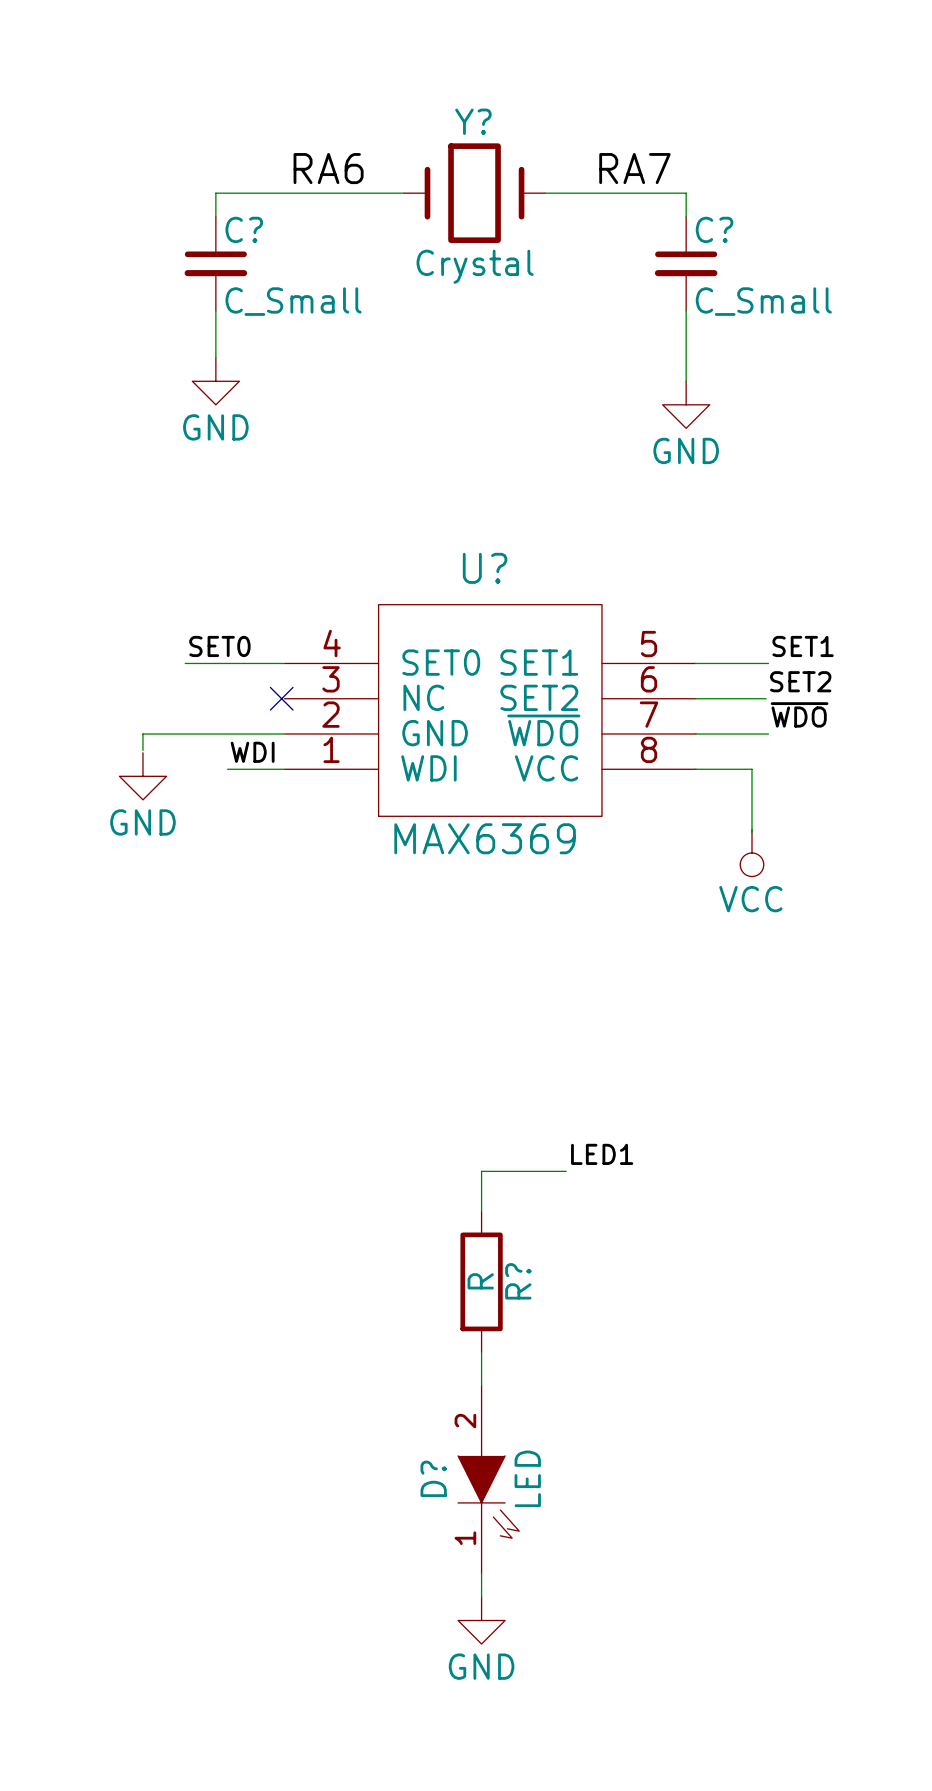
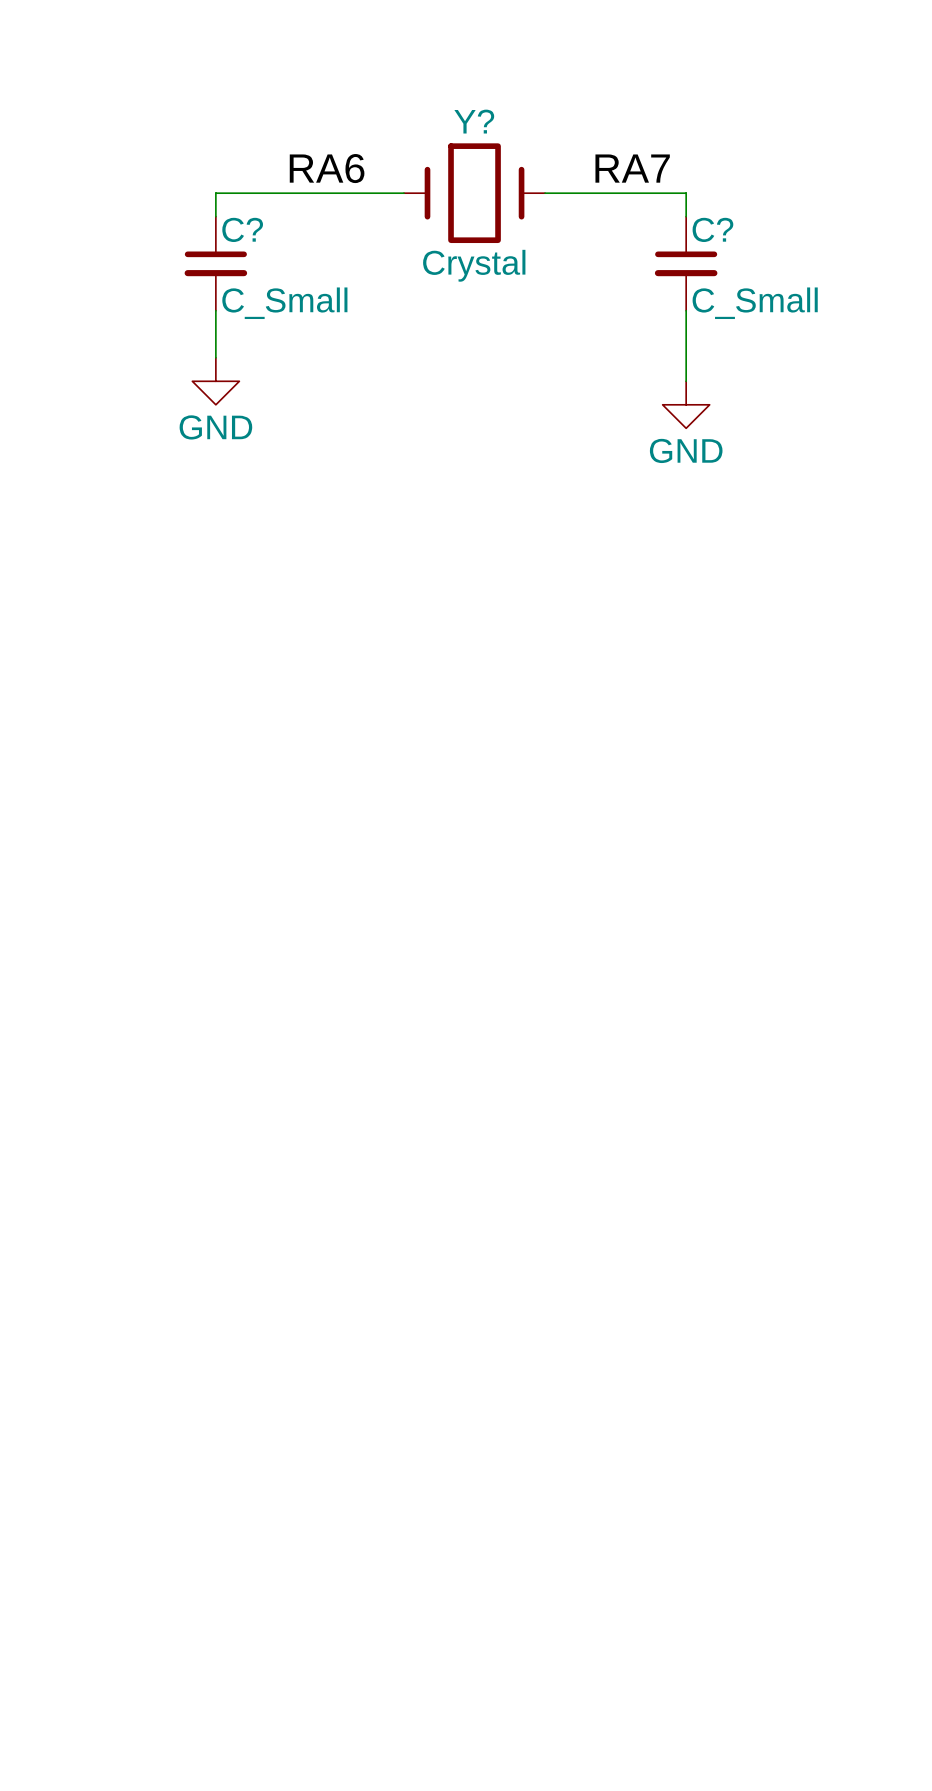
label: SET0 (219, 646) -> none
label: SET1 (803, 646) -> none
wire: (185, 663) (284, 663) -> none
wire: (695, 663) (768, 663) -> none
label: SET2 (800, 681) -> none
no-connect mark: (281, 698) -> none
wire: (695, 698) (766, 698) -> none
U?: MAX6369 (490, 710) -> none
label: ~{WDO} (799, 714) -> none
wire: (284, 734) (142, 734) (142, 750) -> none
wire: (695, 734) (768, 734) -> none
label: WDI (252, 752) -> none
wire: (227, 769) (284, 769) -> none
wire: (695, 769) (751, 769) (751, 832) -> none
power symbol: GND (142, 776) -> none
power symbol: VCC (751, 852) -> none
label: LED1 (602, 1154) -> none
wire: (566, 1171) (481, 1171) (481, 1211) -> none
R?: R (481, 1281) -> none
wire: (481, 1352) (481, 1385) -> none
D?: LED (488, 1479) -> none
wire: (481, 1573) (481, 1596) -> none
power symbol: GND (481, 1620) -> none

